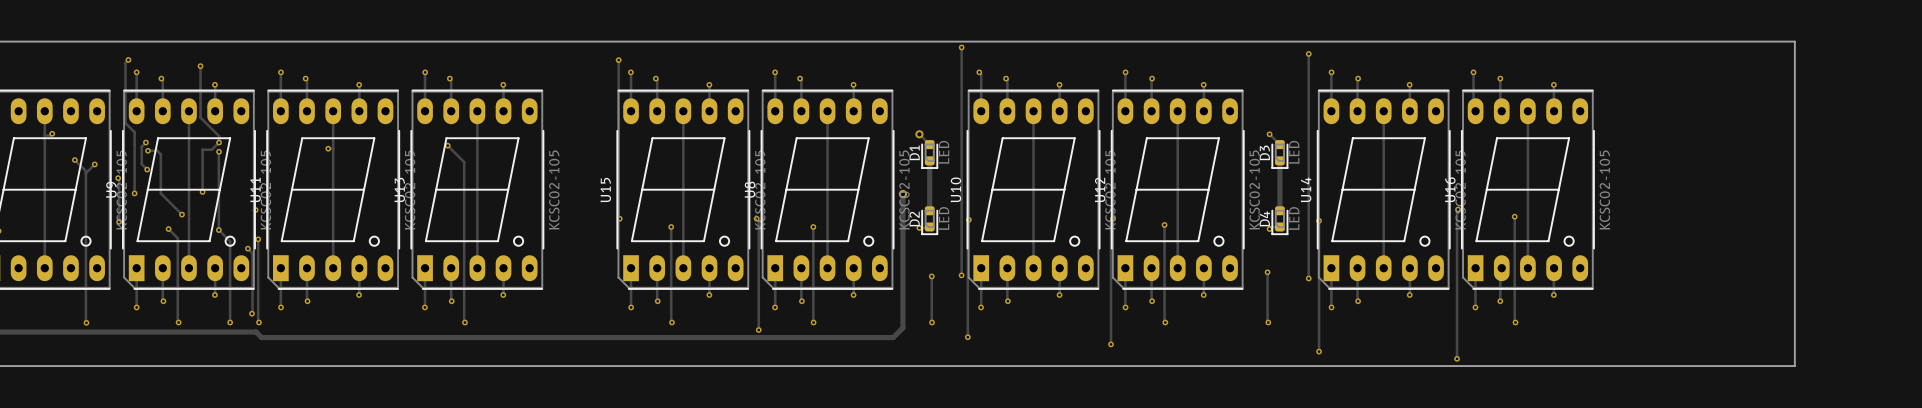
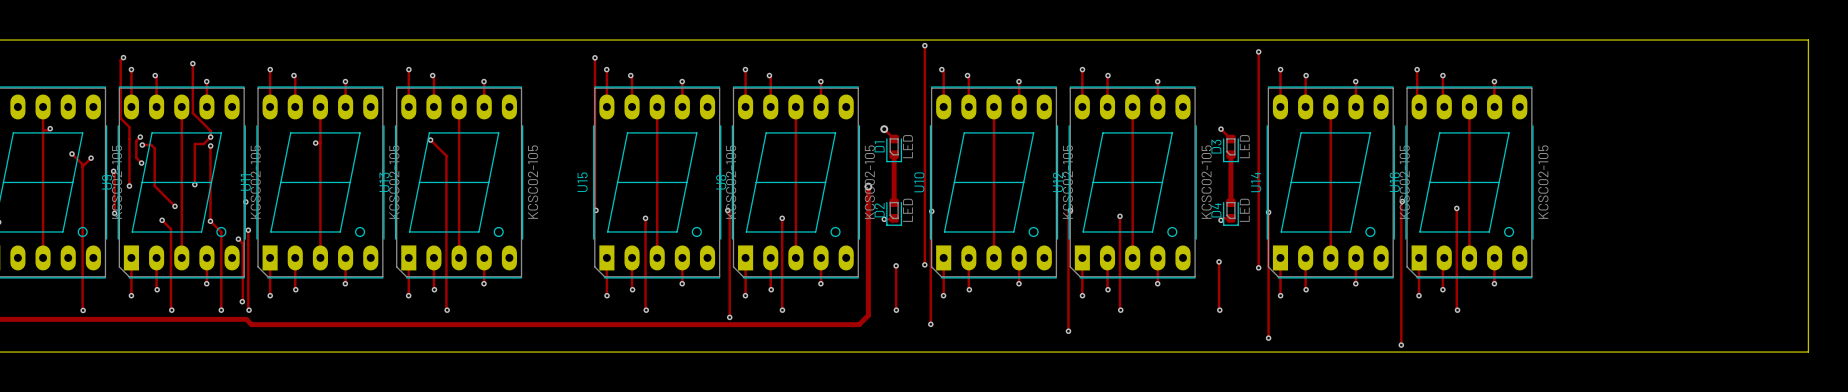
board edge: (1794, 41) (1794, 366) -> (1726, 40) (1808, 40) (1808, 352) (1726, 352)

